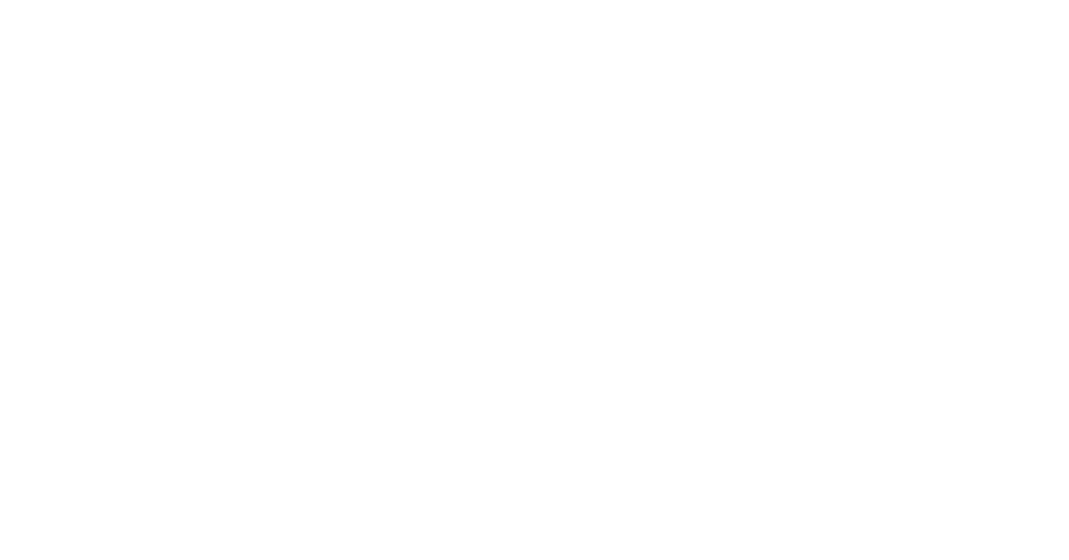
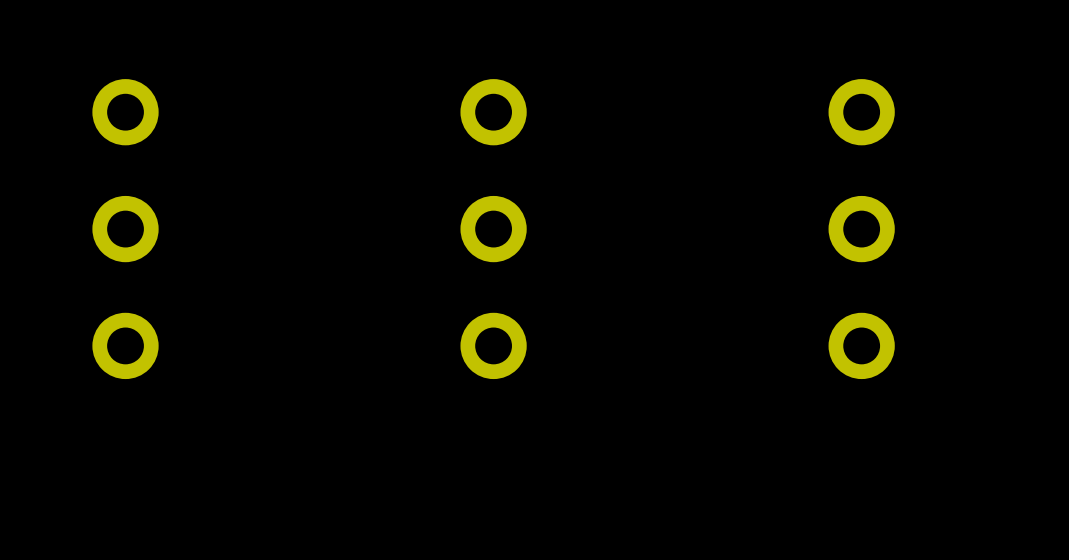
part: none -> (125, 229)
part: none -> (493, 229)
part: none -> (861, 229)

